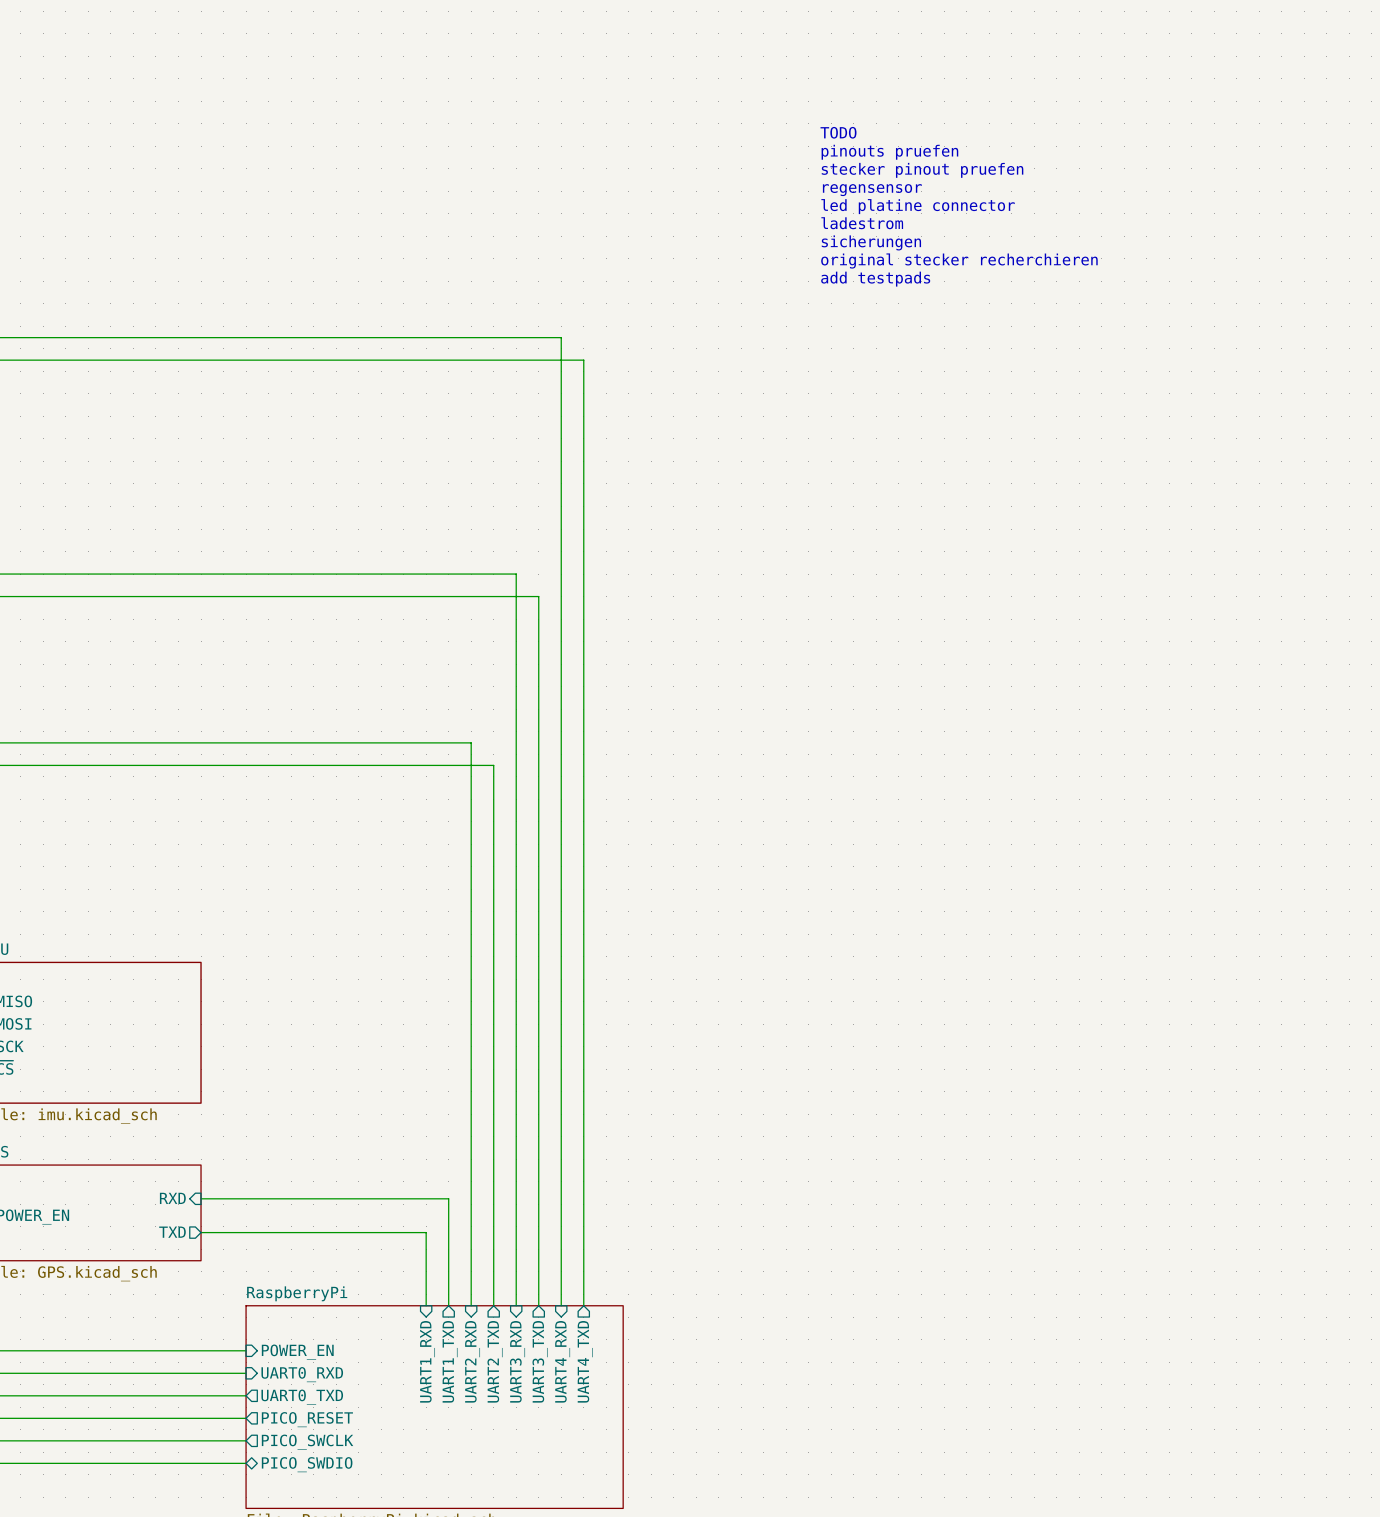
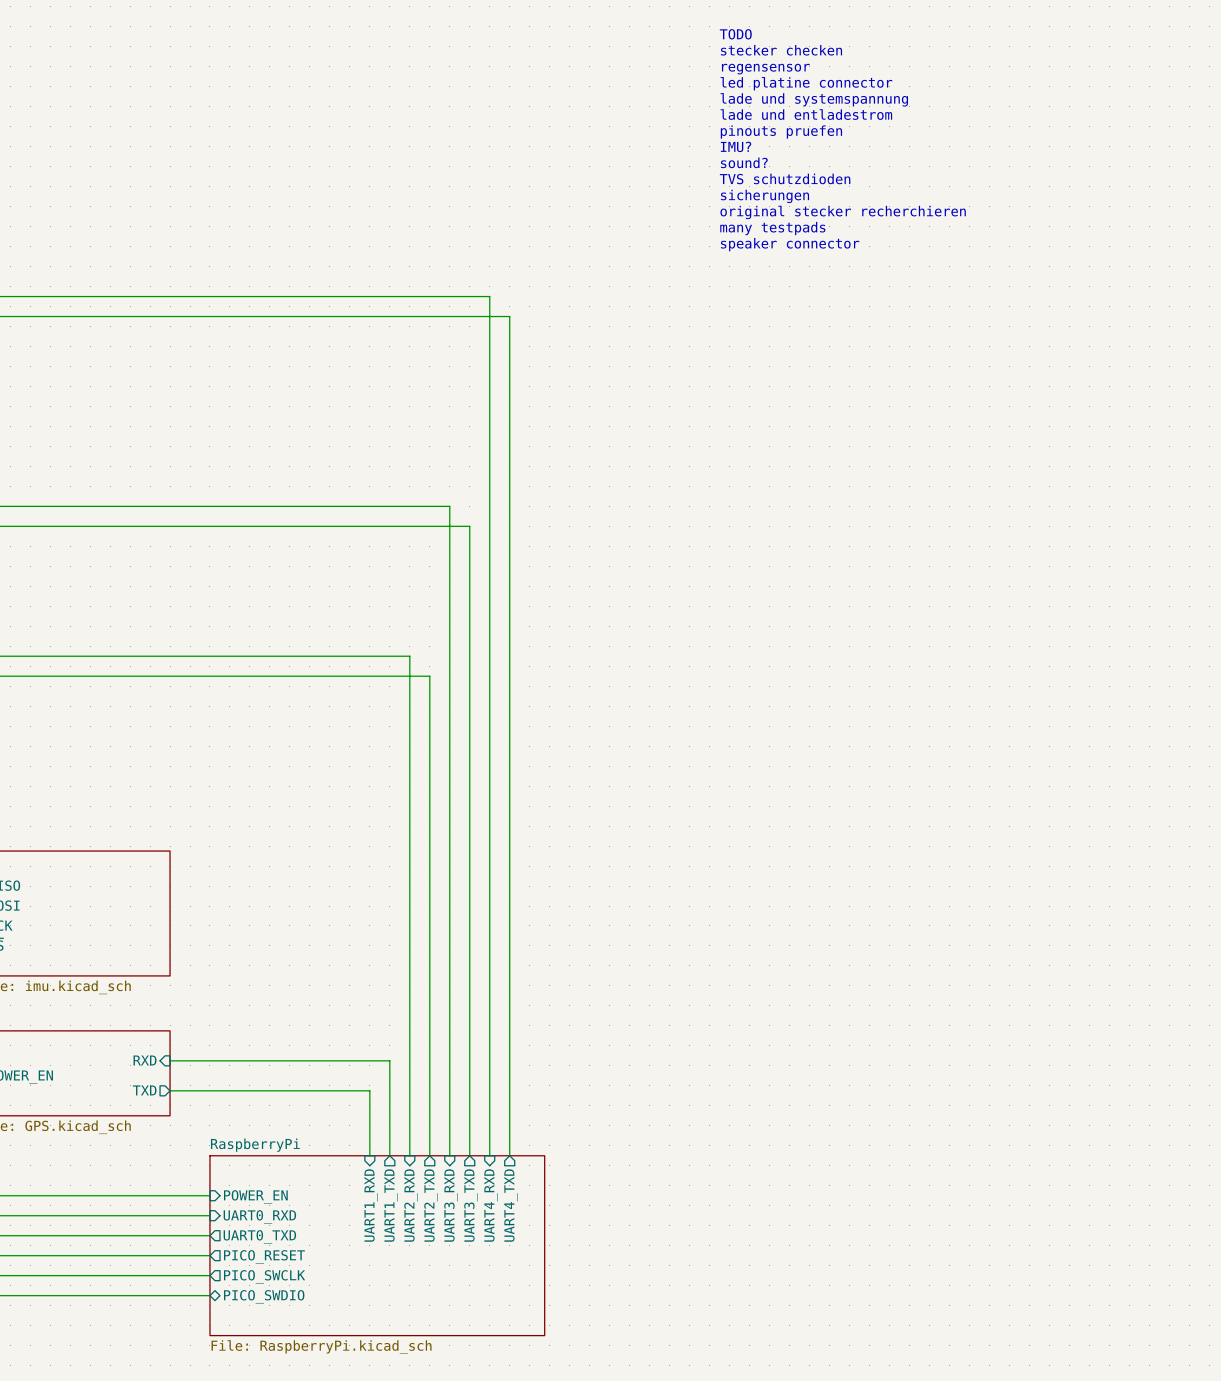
text: none -> TODO (735, 34)
text: none -> stecker checken (781, 50)
text: none -> regensensor (765, 69)
text: none -> led platine connector (806, 83)
text: none -> lade und systemspannung (814, 99)
text: TODO (838, 132) -> lade und entladestrom (806, 114)
text: stecker pinout pruefen (922, 170) -> IMU? (736, 146)
text: regensensor (872, 190) -> sound? (744, 162)
text: led platine connector (918, 206) -> TVS schutzdioden (785, 178)
text: ladestrom (862, 223) -> sicherungen (765, 196)
text: sicherungen (871, 242) -> original stecker recherchieren (843, 212)
text: original stecker recherchieren (959, 261) -> many testpads (772, 228)
text: add testpads (875, 279) -> speaker connector (790, 244)

